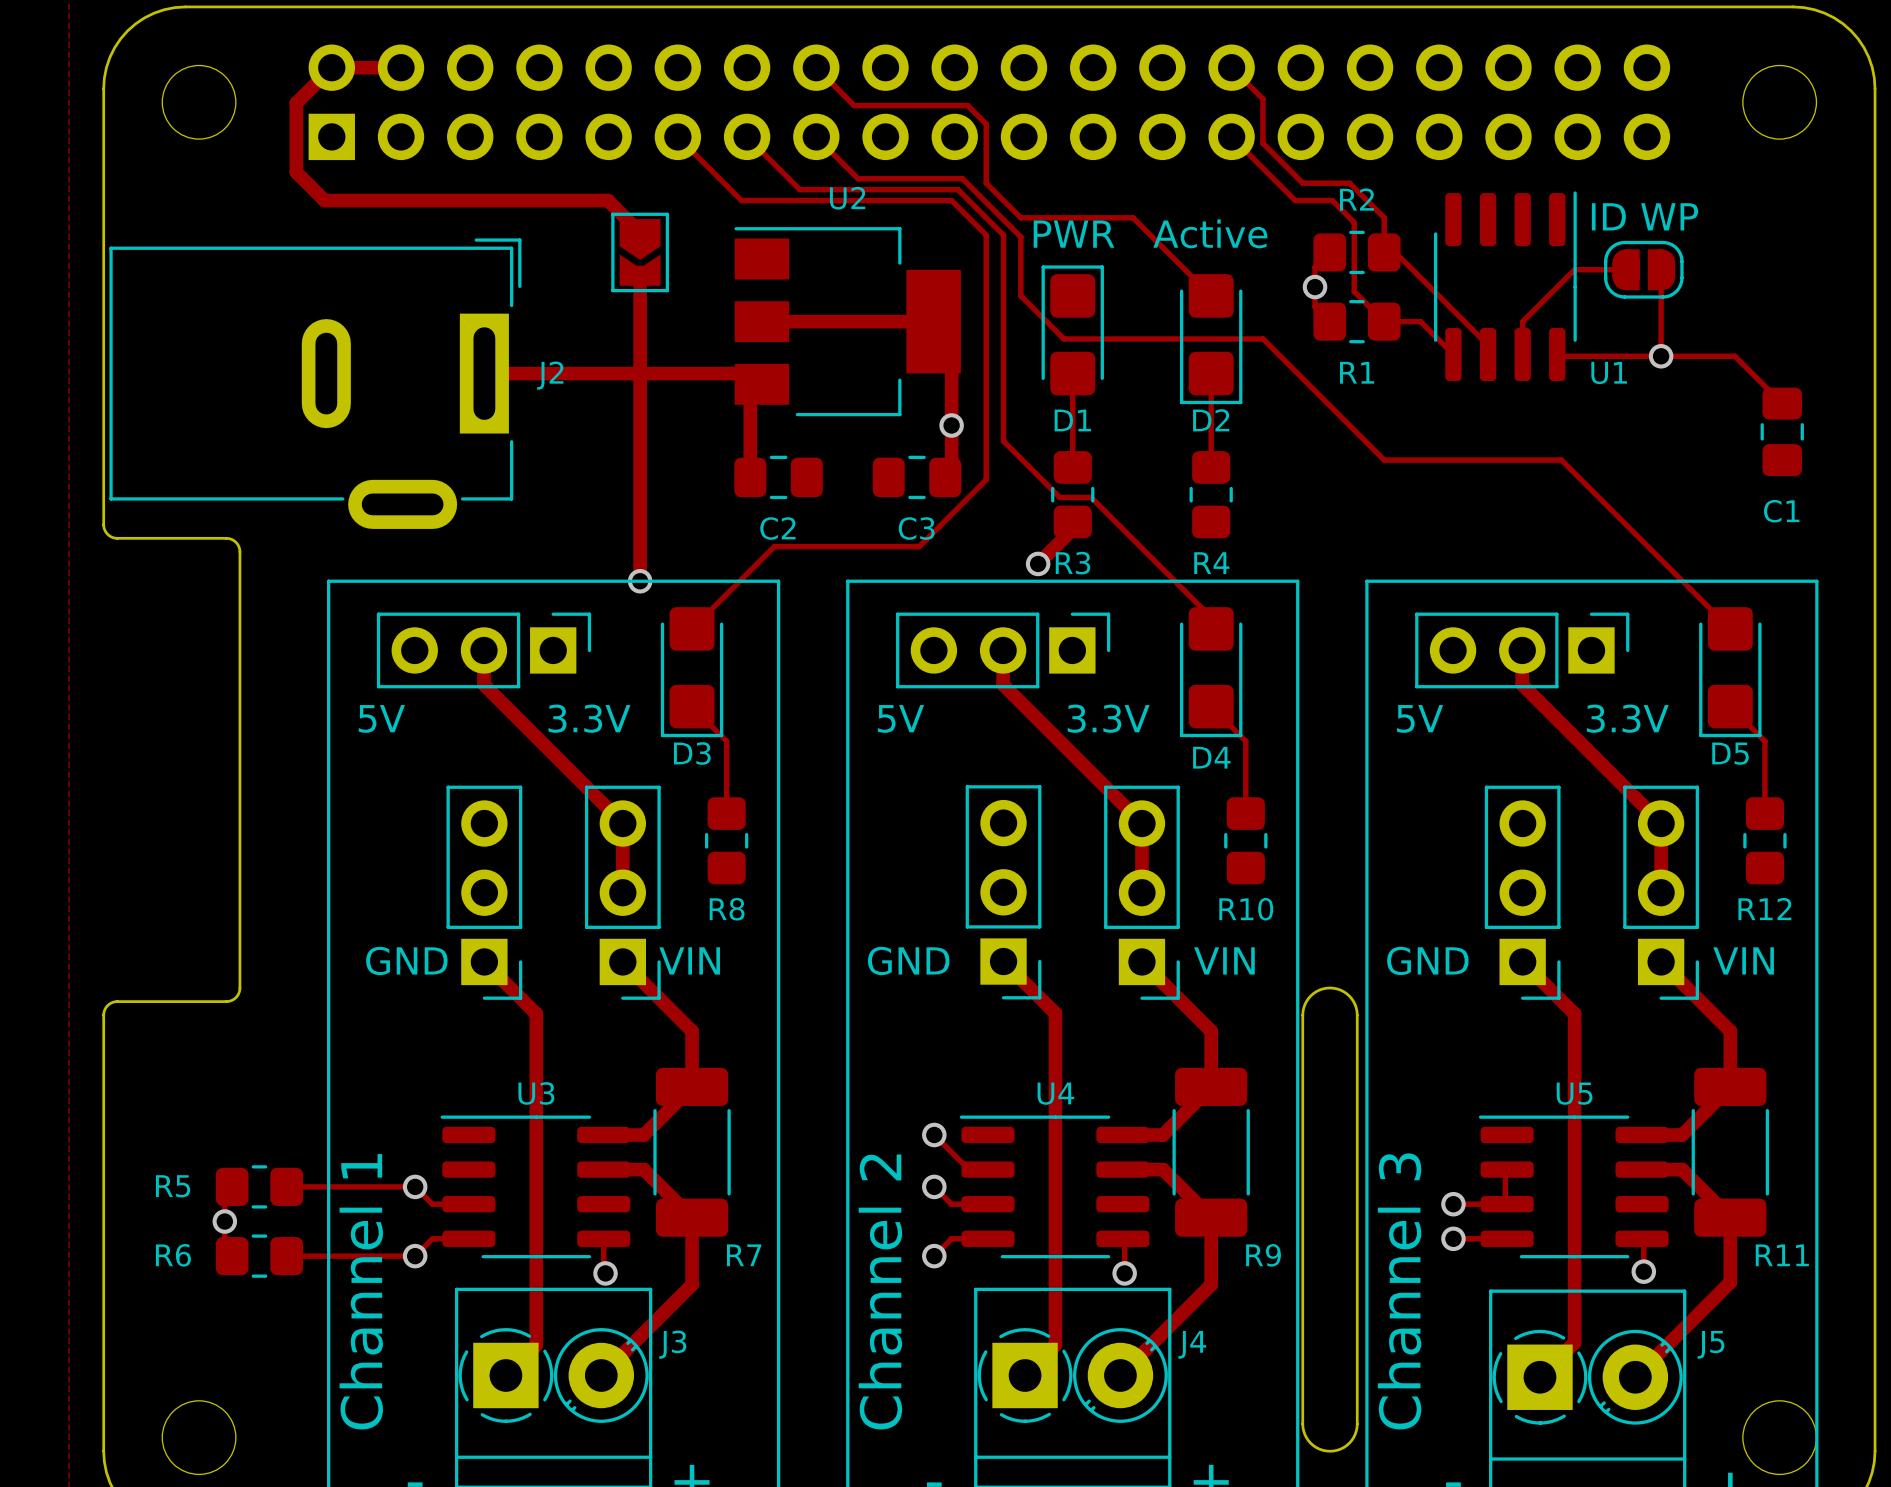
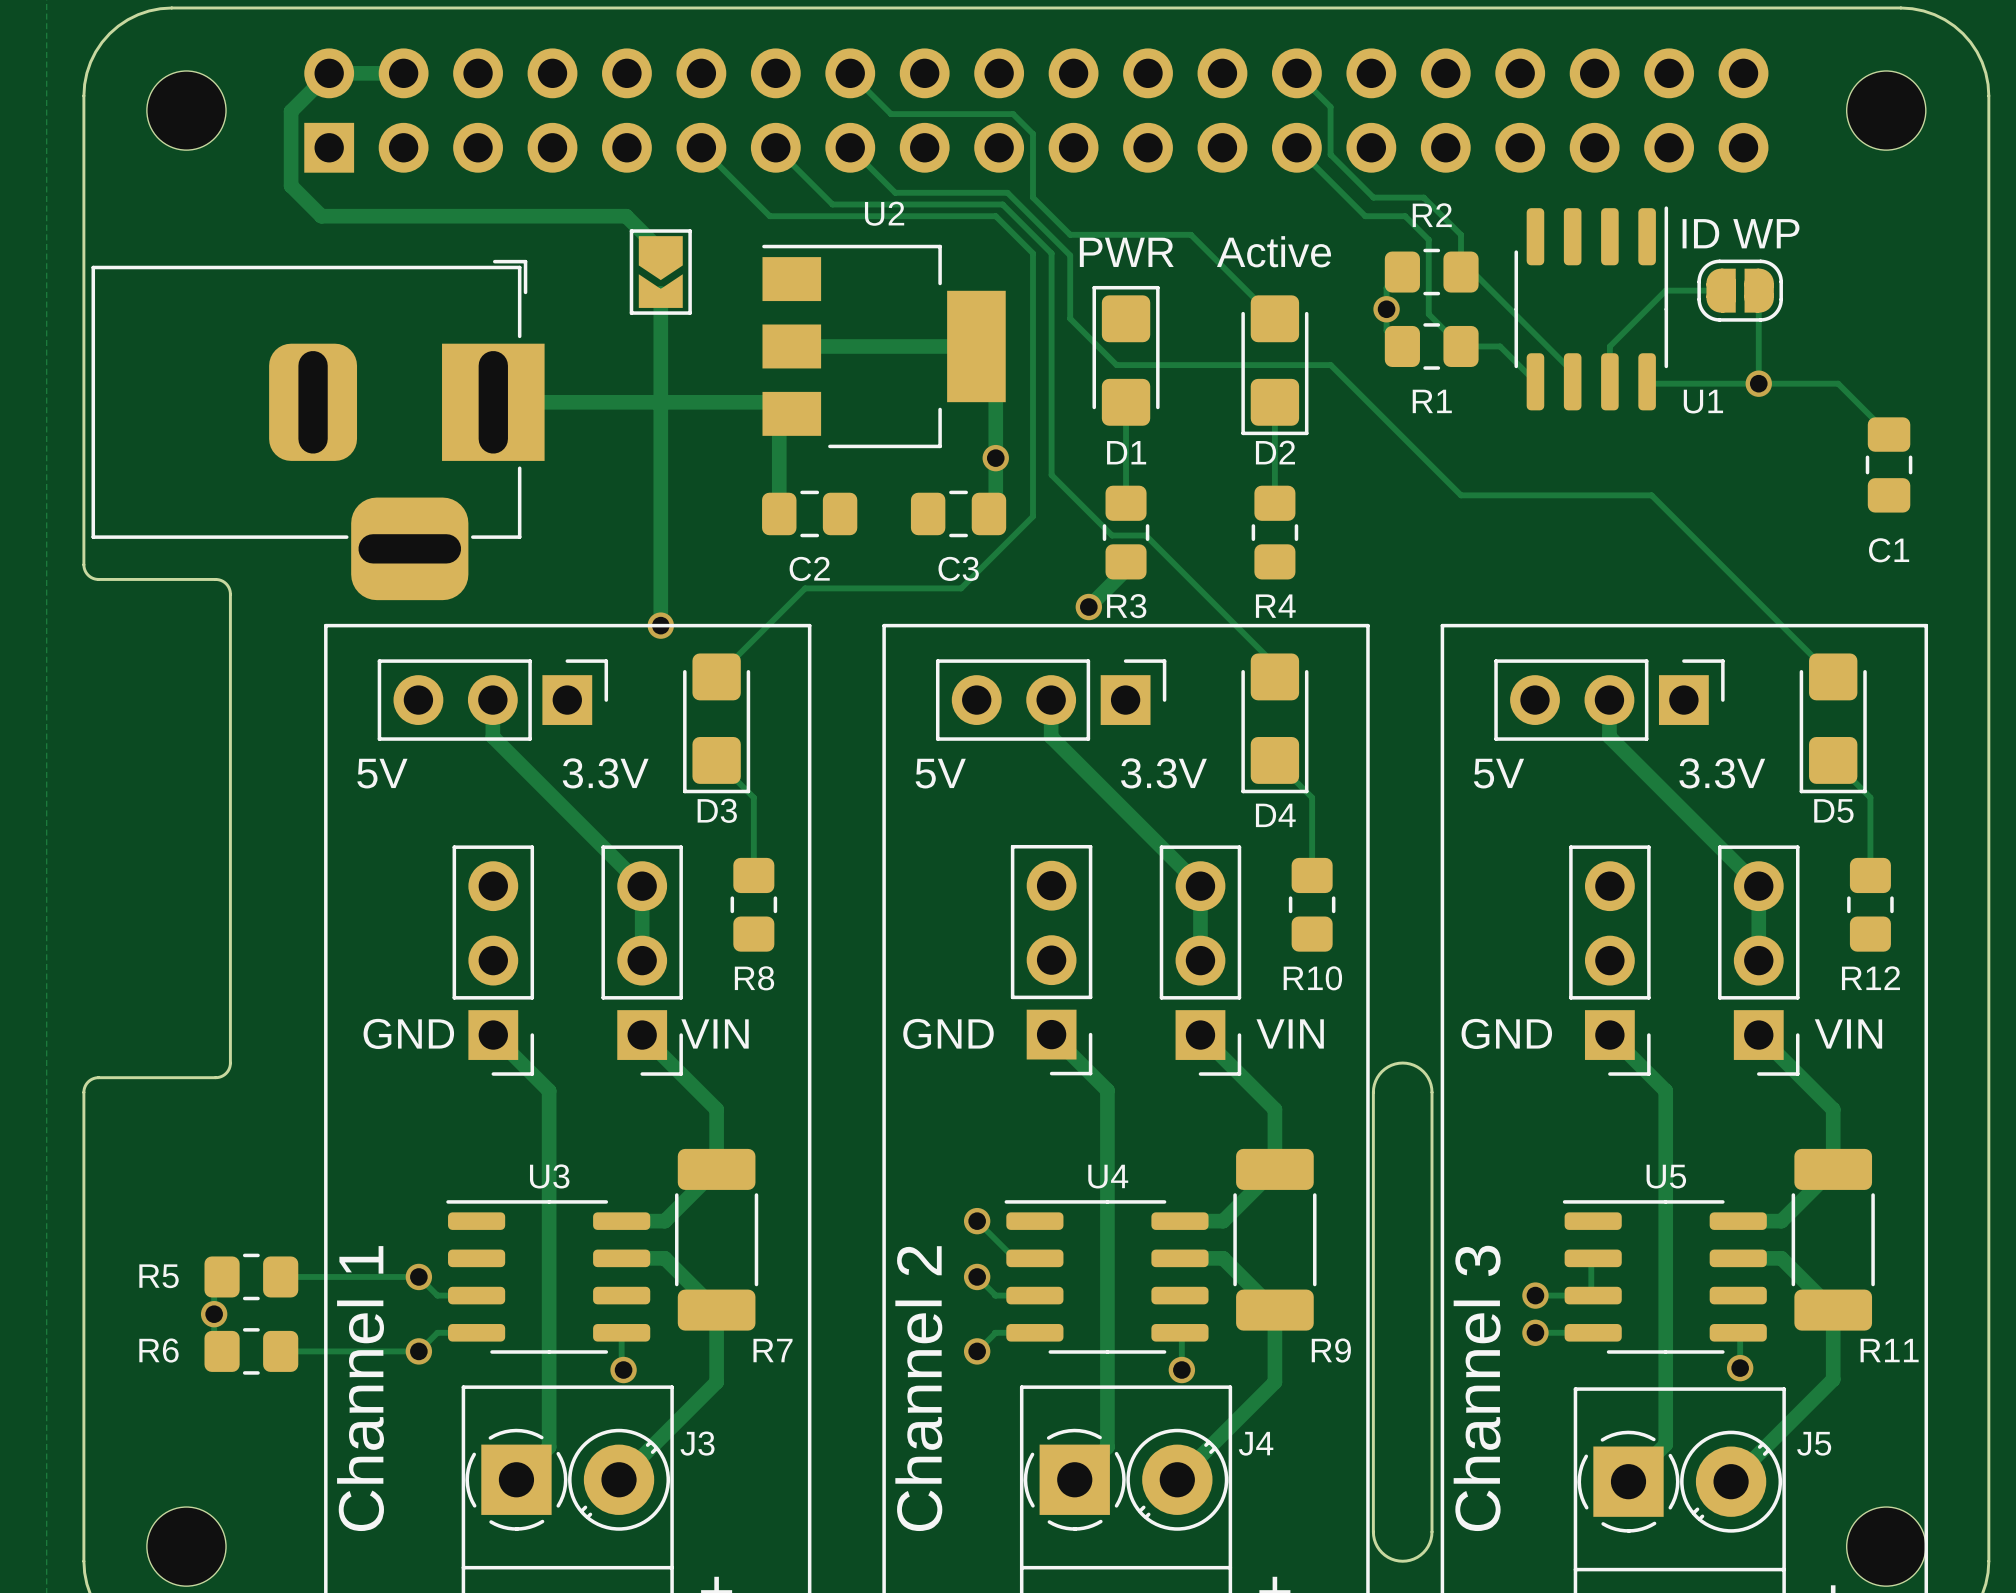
J2: (315, 383) -> none
part: none -> (318, 430)

